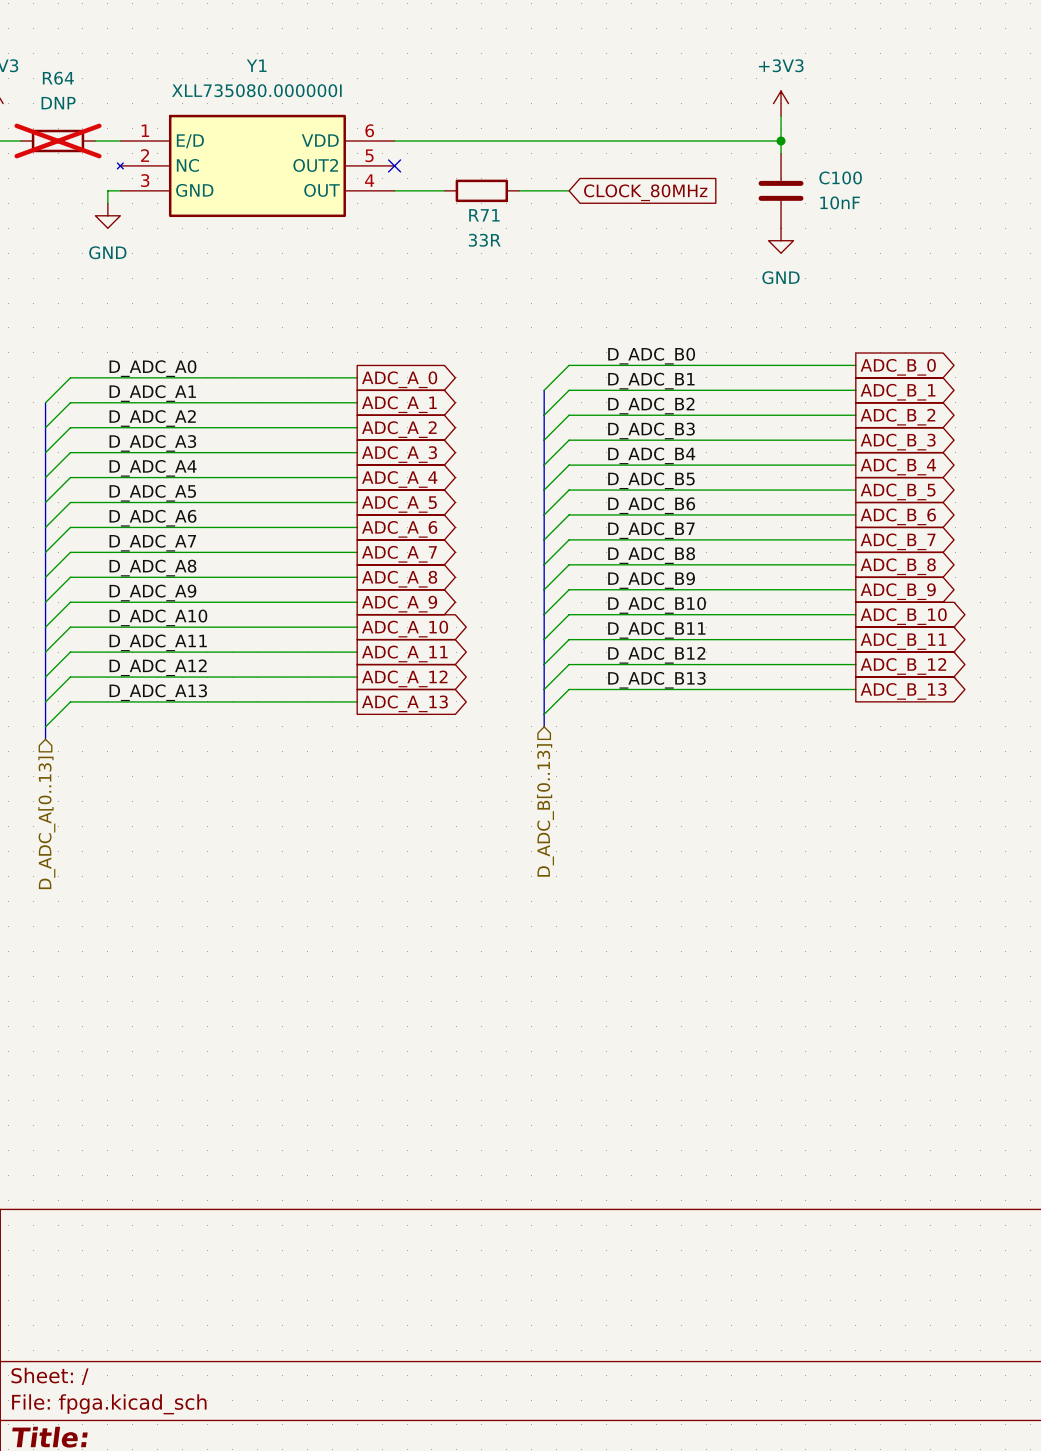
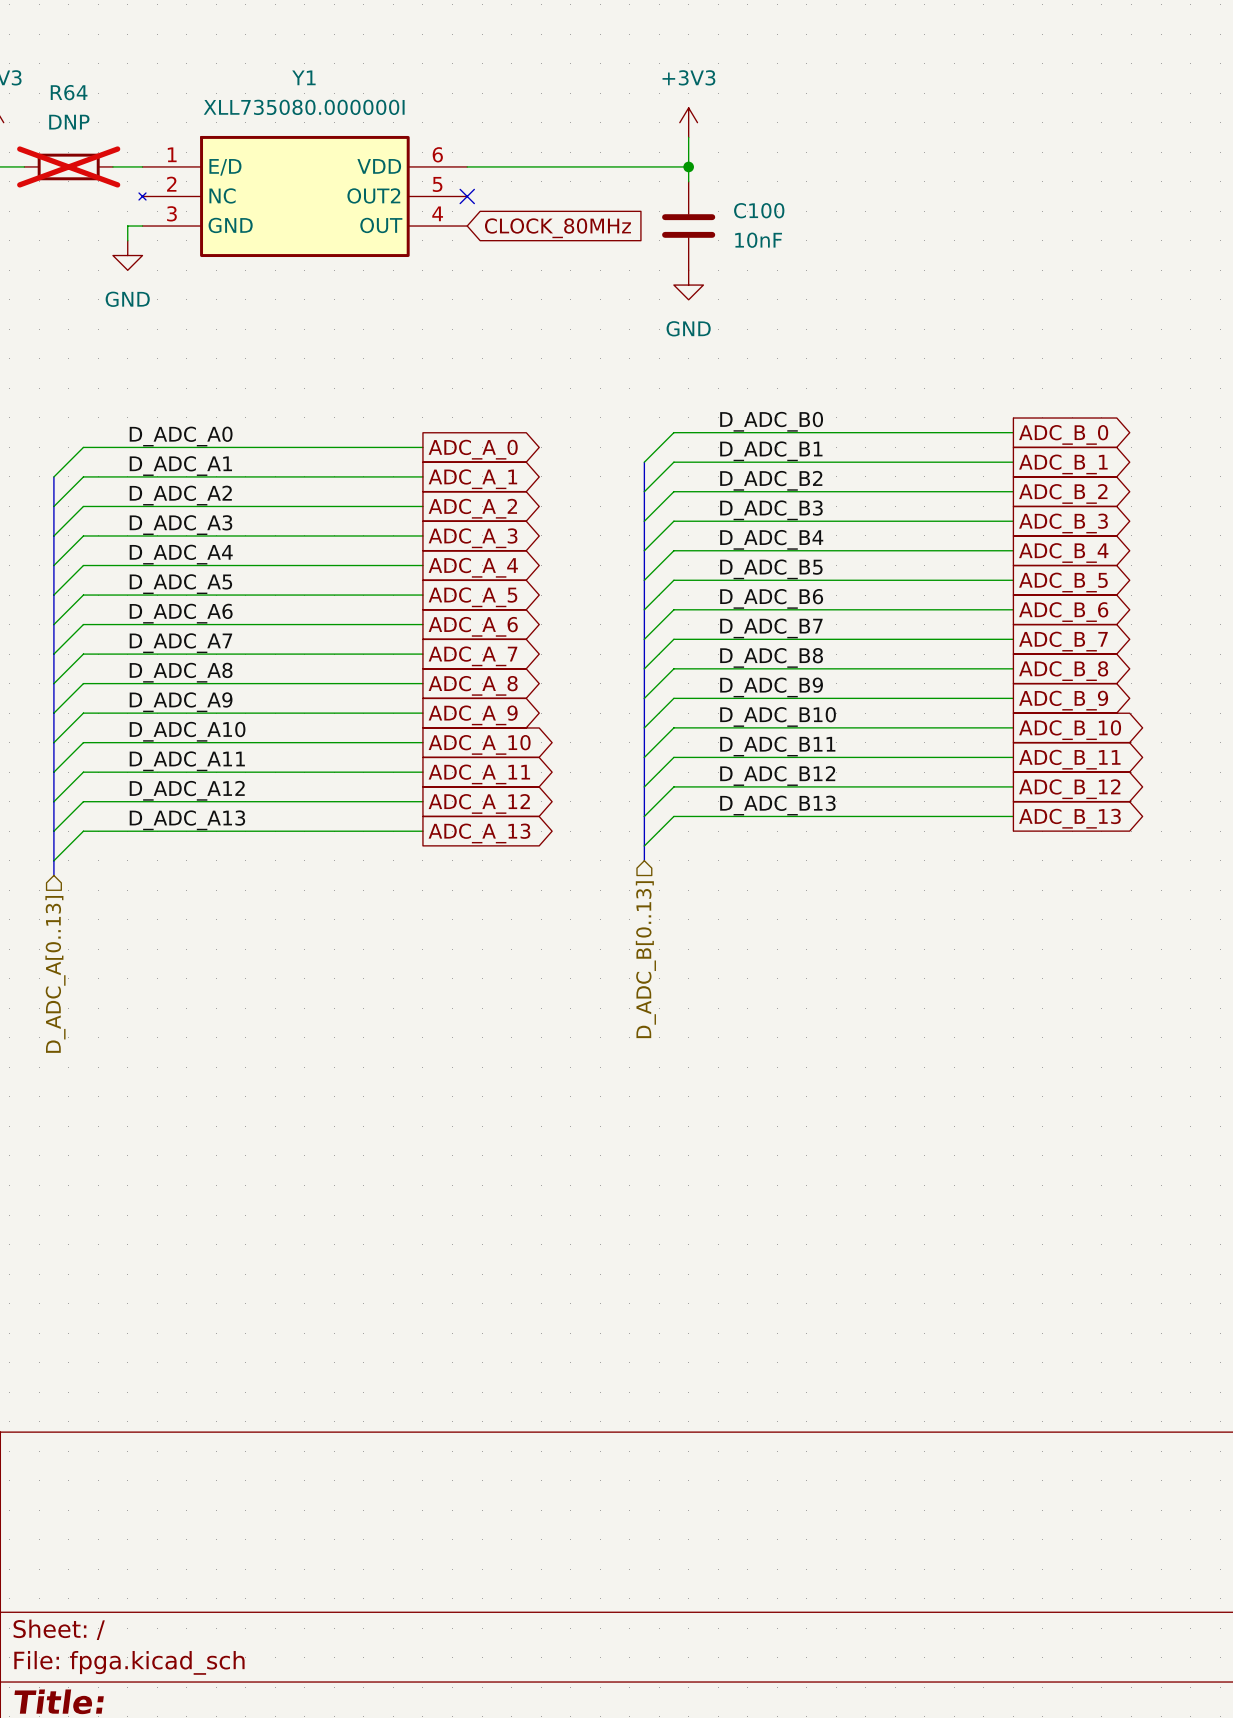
power symbol position: +3V3 (781, 103) -> +3V3 (688, 122)
wire: (781, 116) (781, 153) -> (688, 137) (688, 181)
wire: (581, 141) (781, 141) -> none
junction: none -> (688, 166)
junction: (781, 141) -> none
wire: (394, 190) (444, 190) -> none
R71: 33R (481, 190) -> none
wire: (519, 190) (569, 190) -> none
C100 position: (781, 190) -> (688, 226)
global label position: CLOCK_80MHz (645, 192) -> CLOCK_80MHz (557, 228)
power symbol position: GND (781, 240) -> GND (688, 285)

